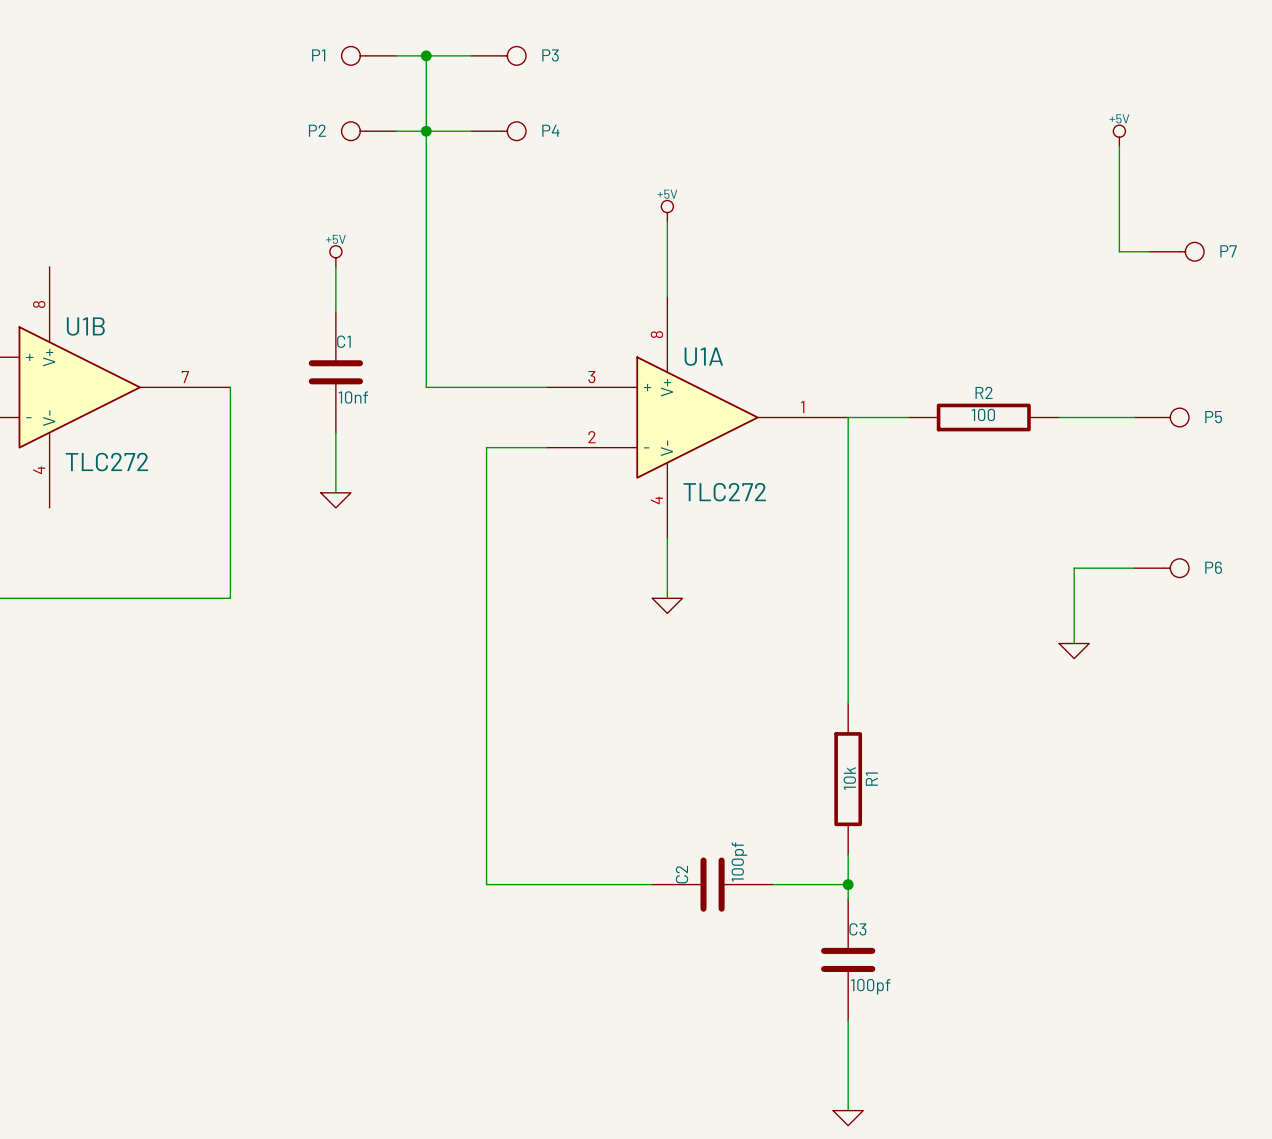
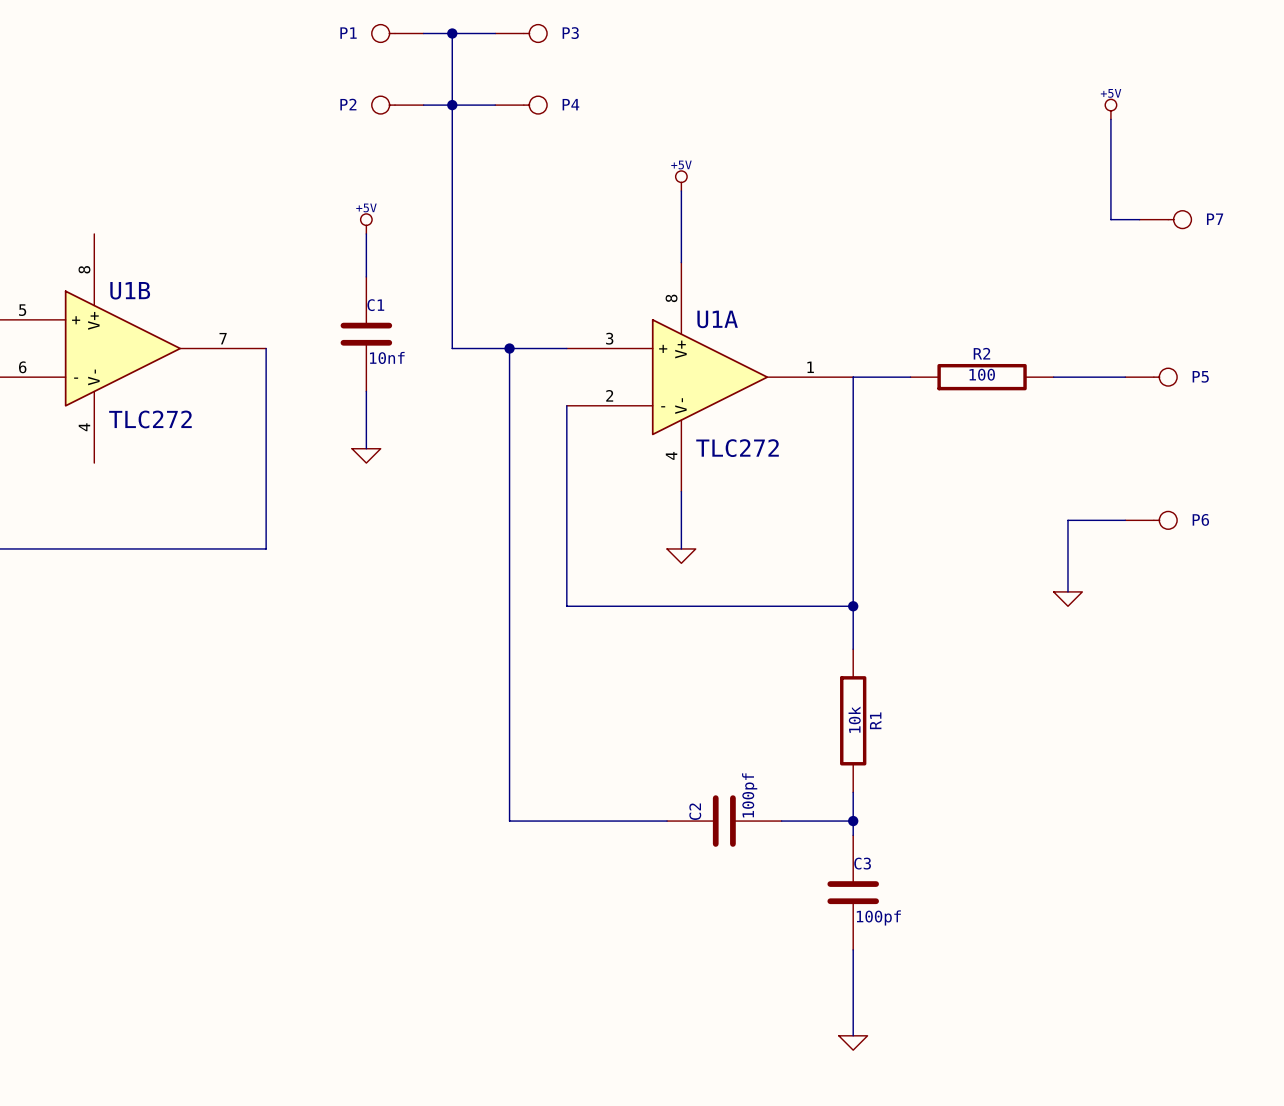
junction: none -> (509, 348)
wire: (486, 447) (546, 447) -> (509, 405) (509, 348)
wire: none -> (566, 405) (566, 606) (853, 606)
junction: none -> (853, 606)

